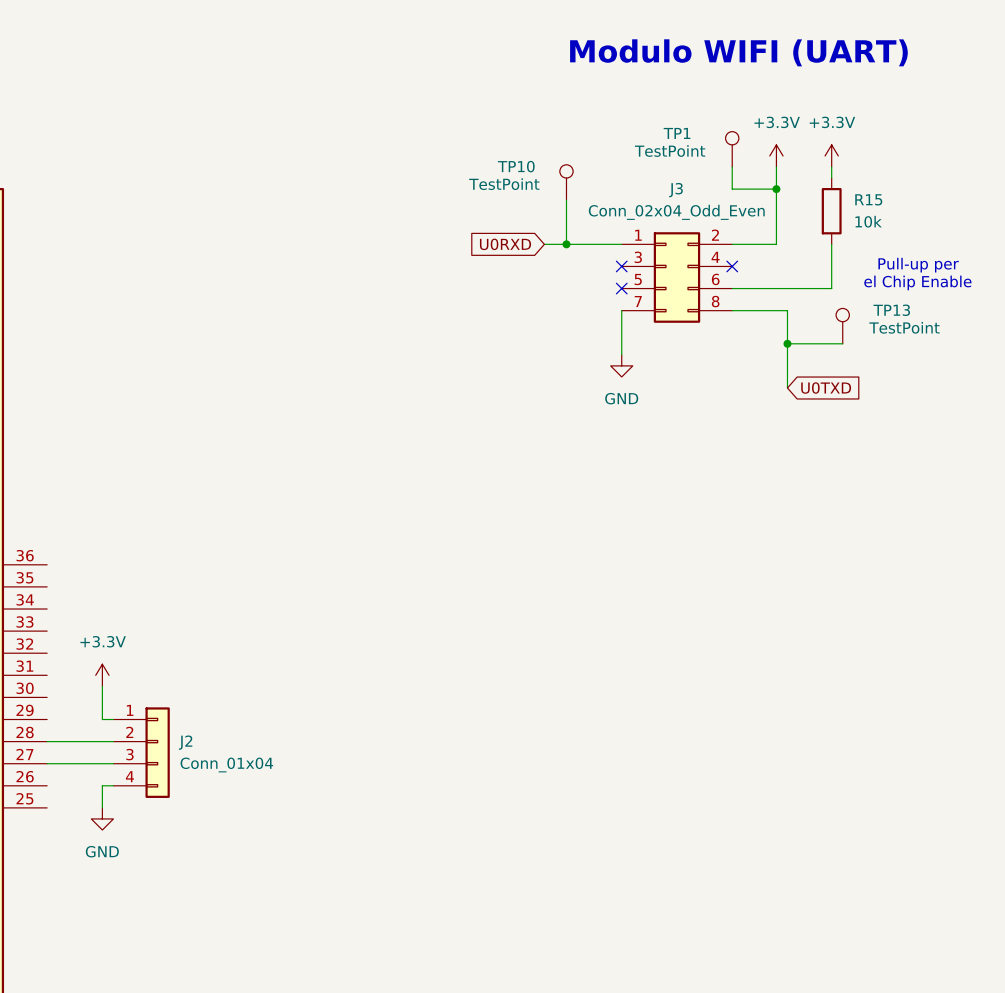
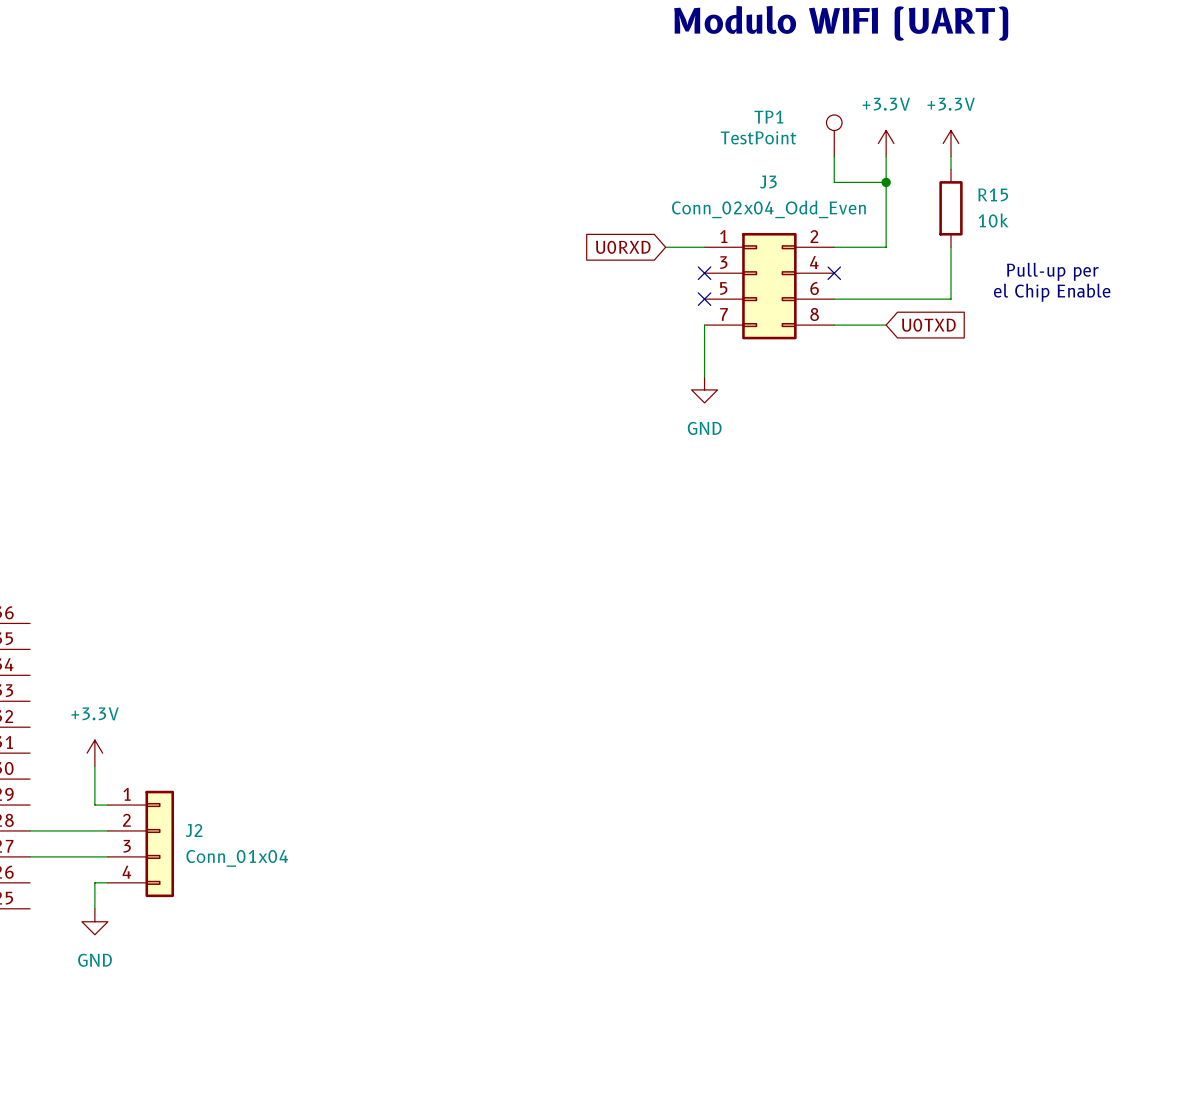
TP10: TestPoint (566, 182) -> none
wire: (566, 200) (566, 244) -> none
global label position: U0RXD (505, 244) -> U0RXD (623, 247)
wire: (544, 244) (588, 244) -> none
junction: (566, 244) -> none
wire: (776, 310) (787, 310) (787, 388) -> none
TP13: TestPoint (842, 326) -> none
wire: (787, 343) (842, 343) -> none
junction: (787, 343) -> none
global label position: U0TXD (826, 388) -> U0TXD (928, 325)

